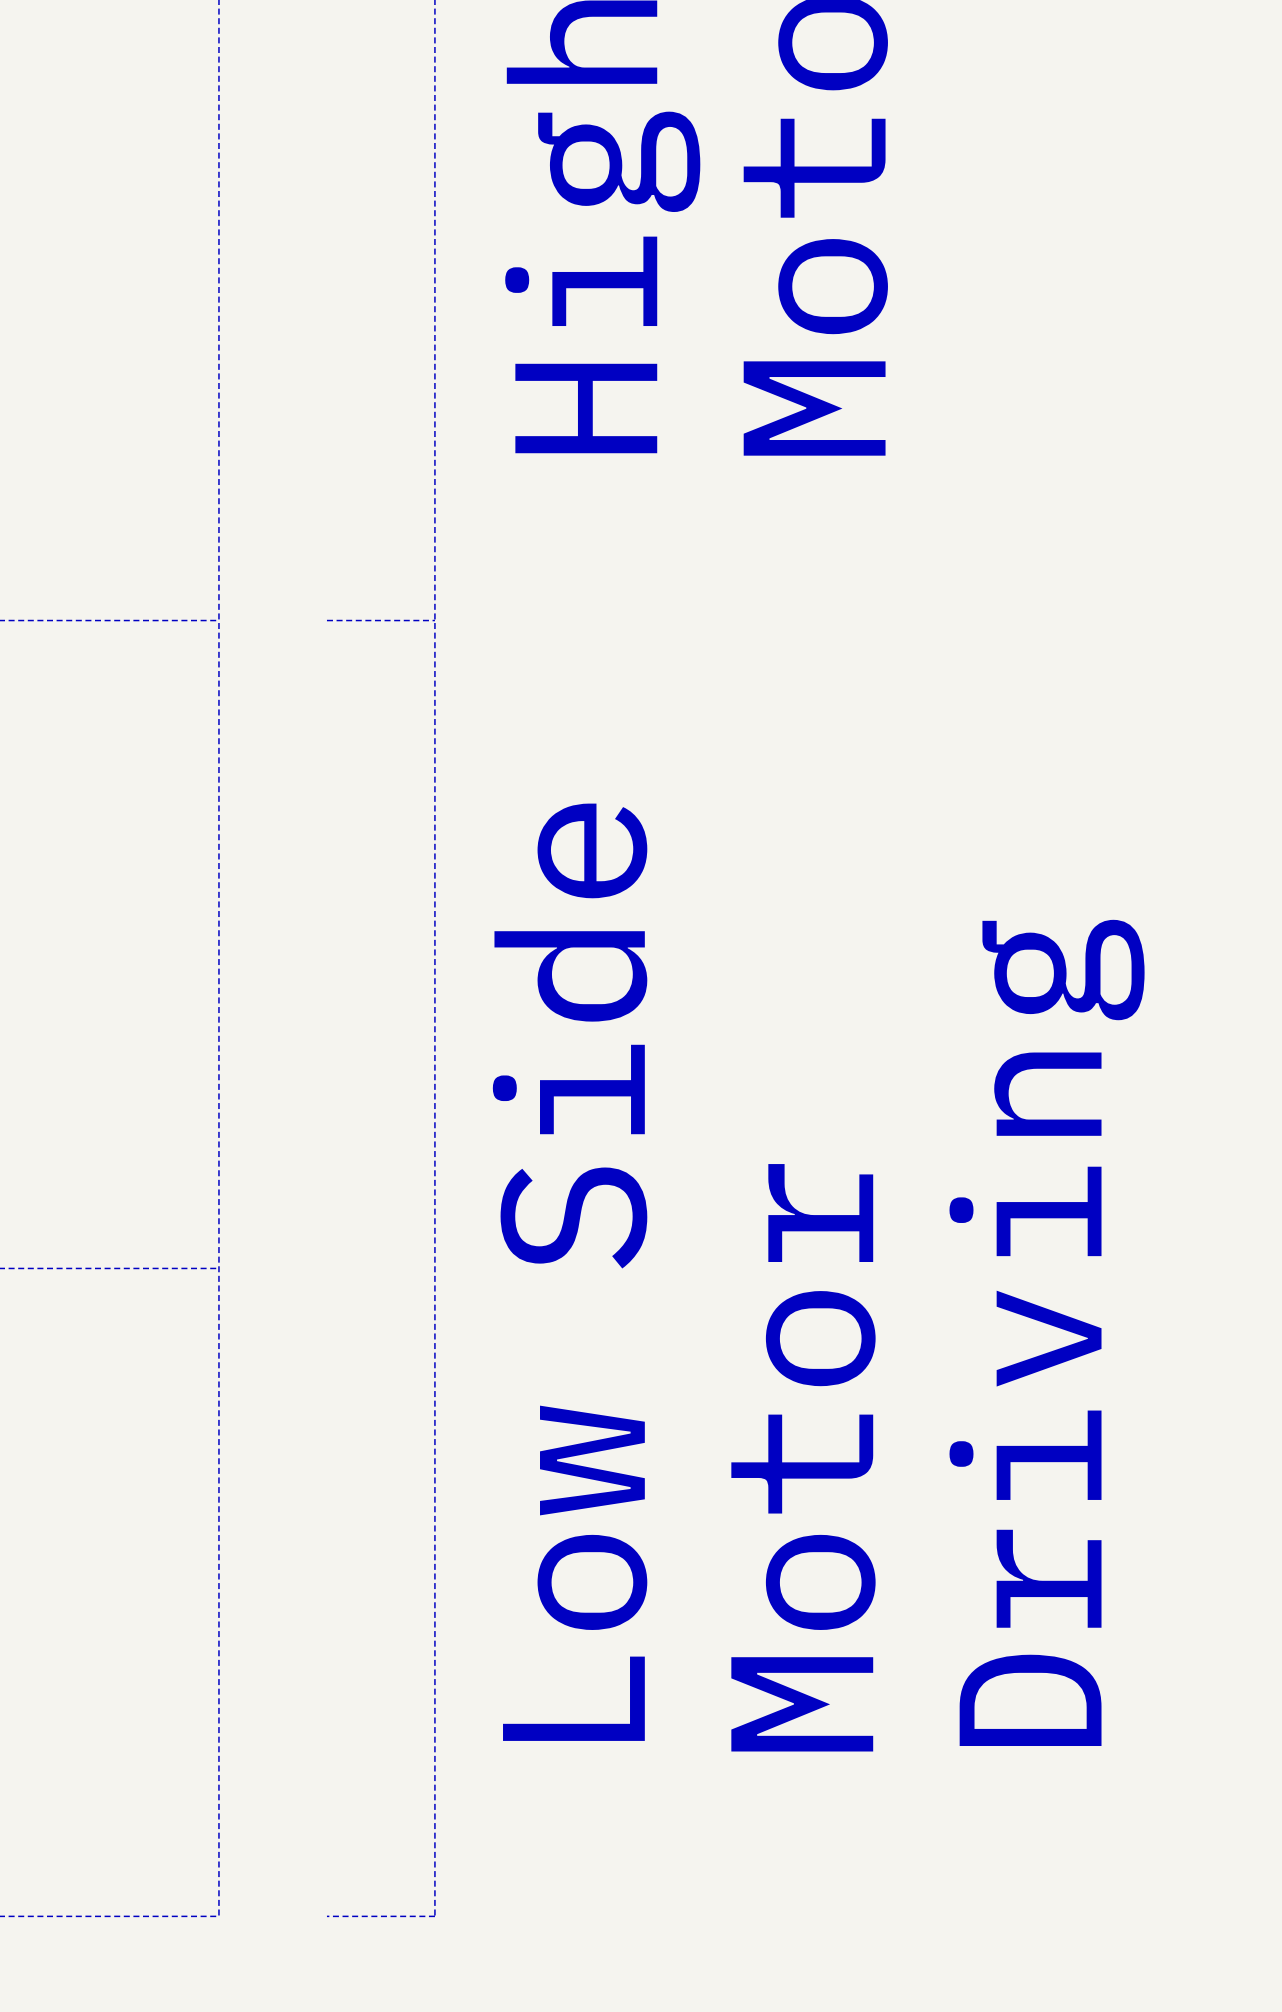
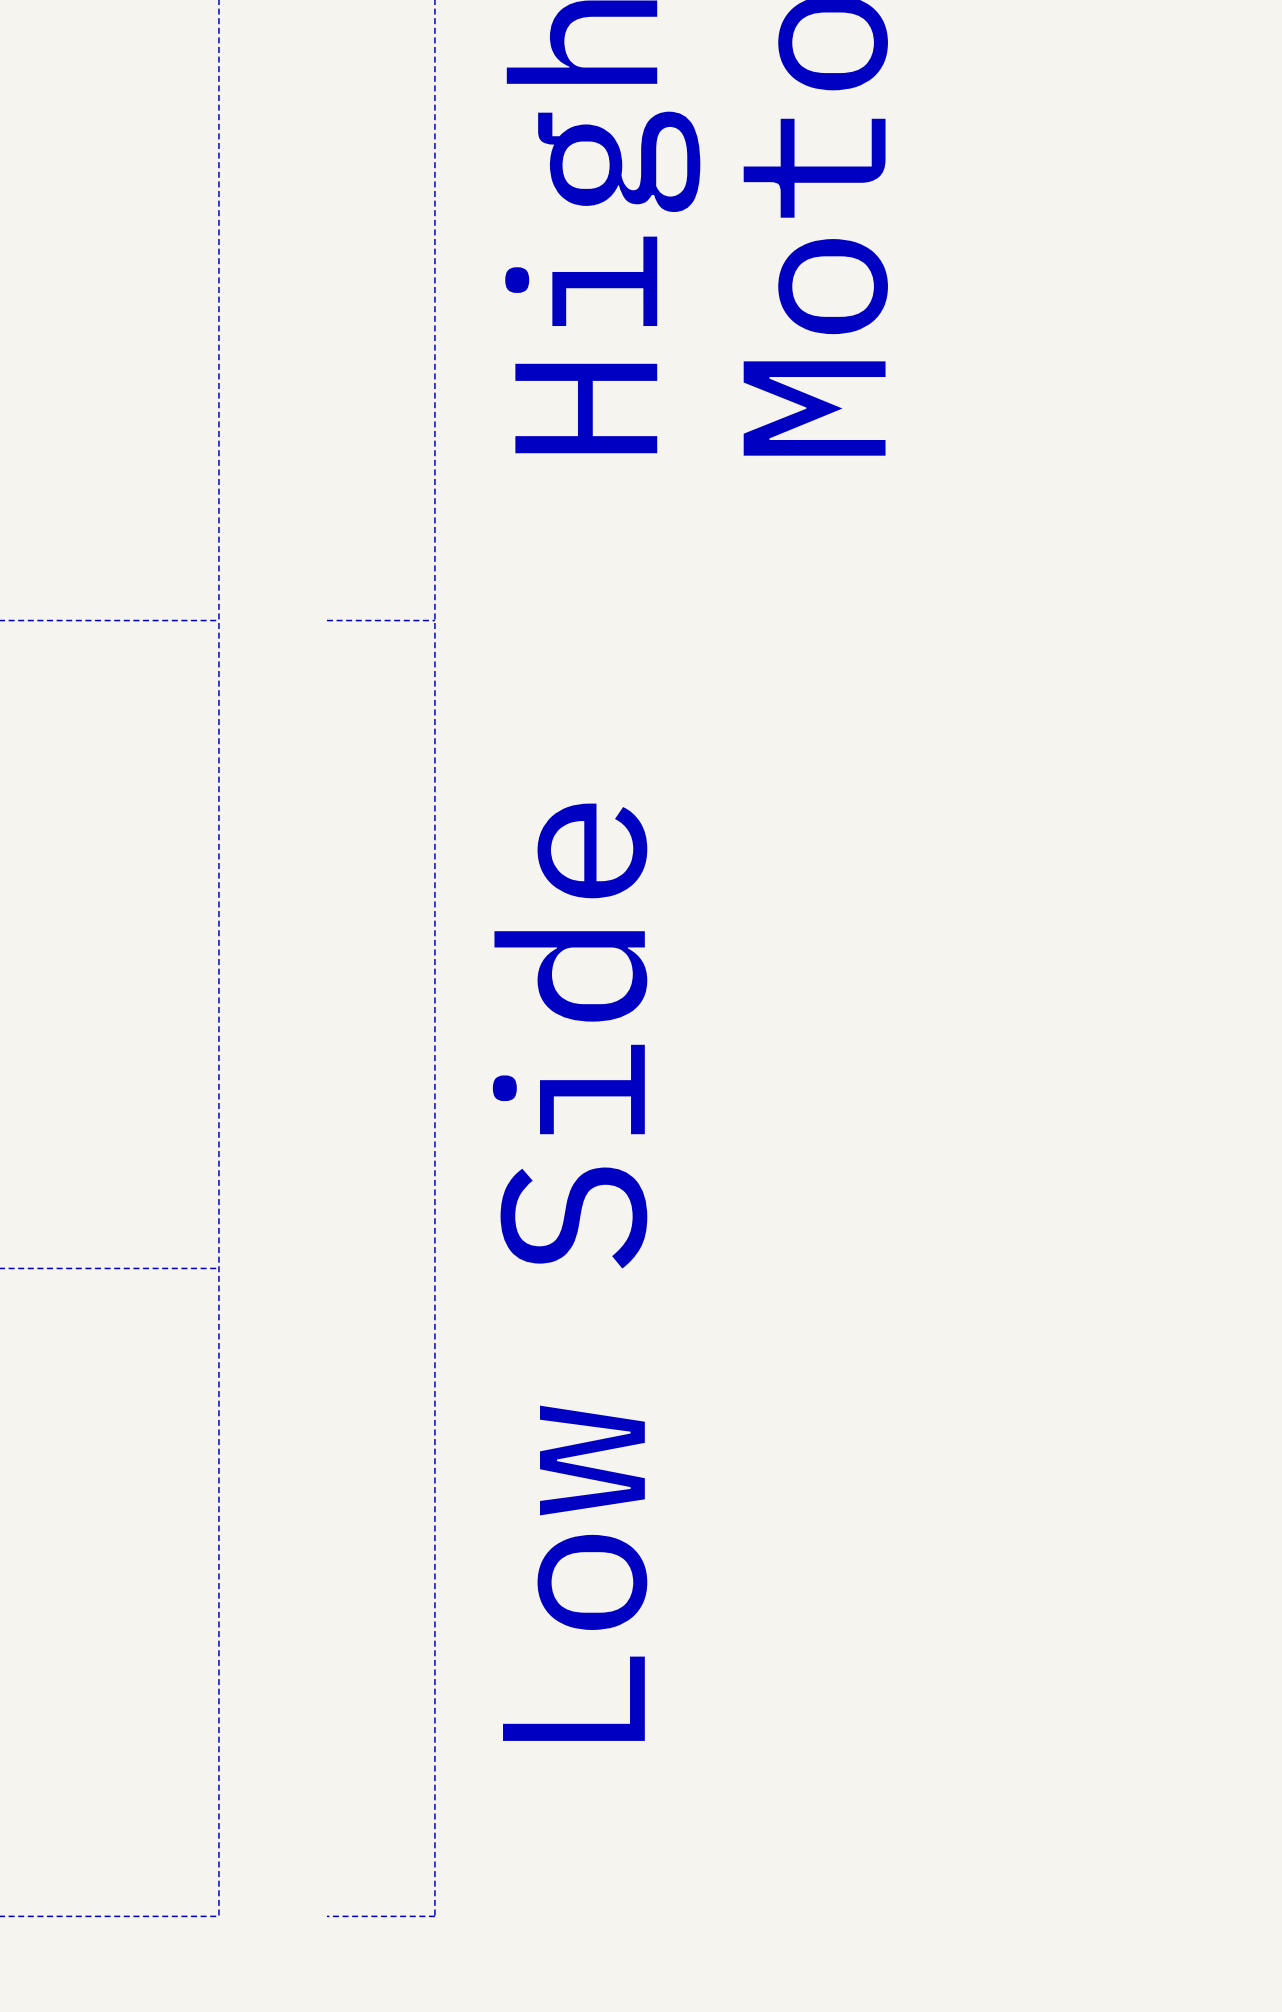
text: Driving (1047, 1332) -> none
text: Motor (803, 1457) -> none

